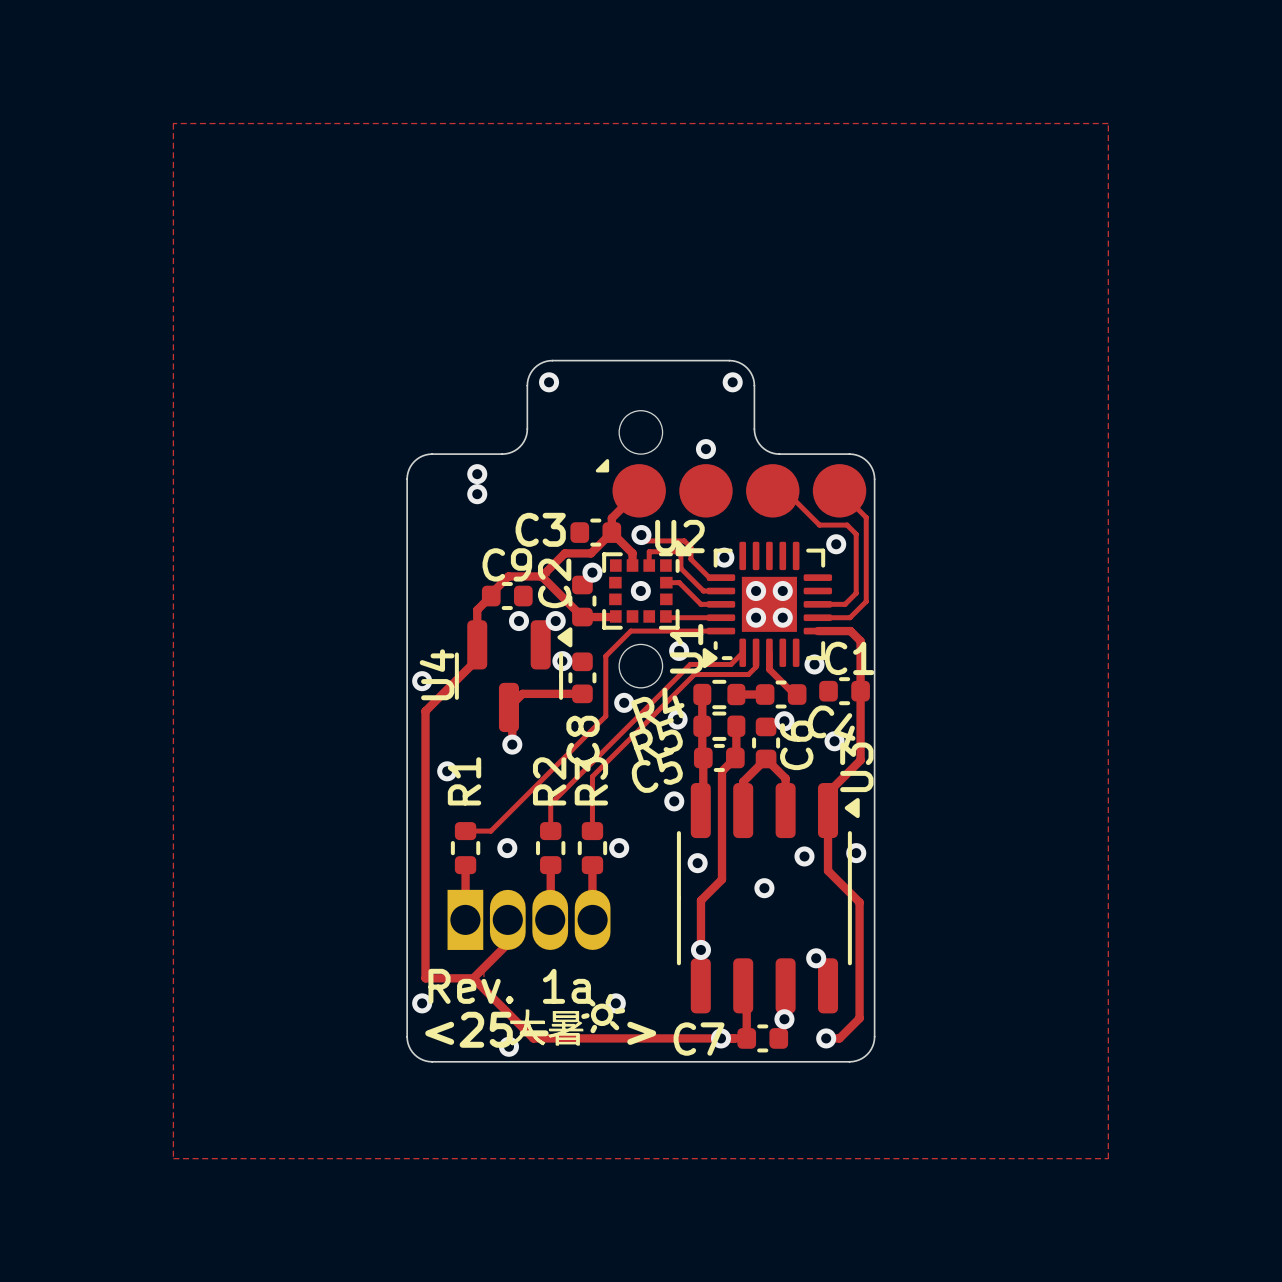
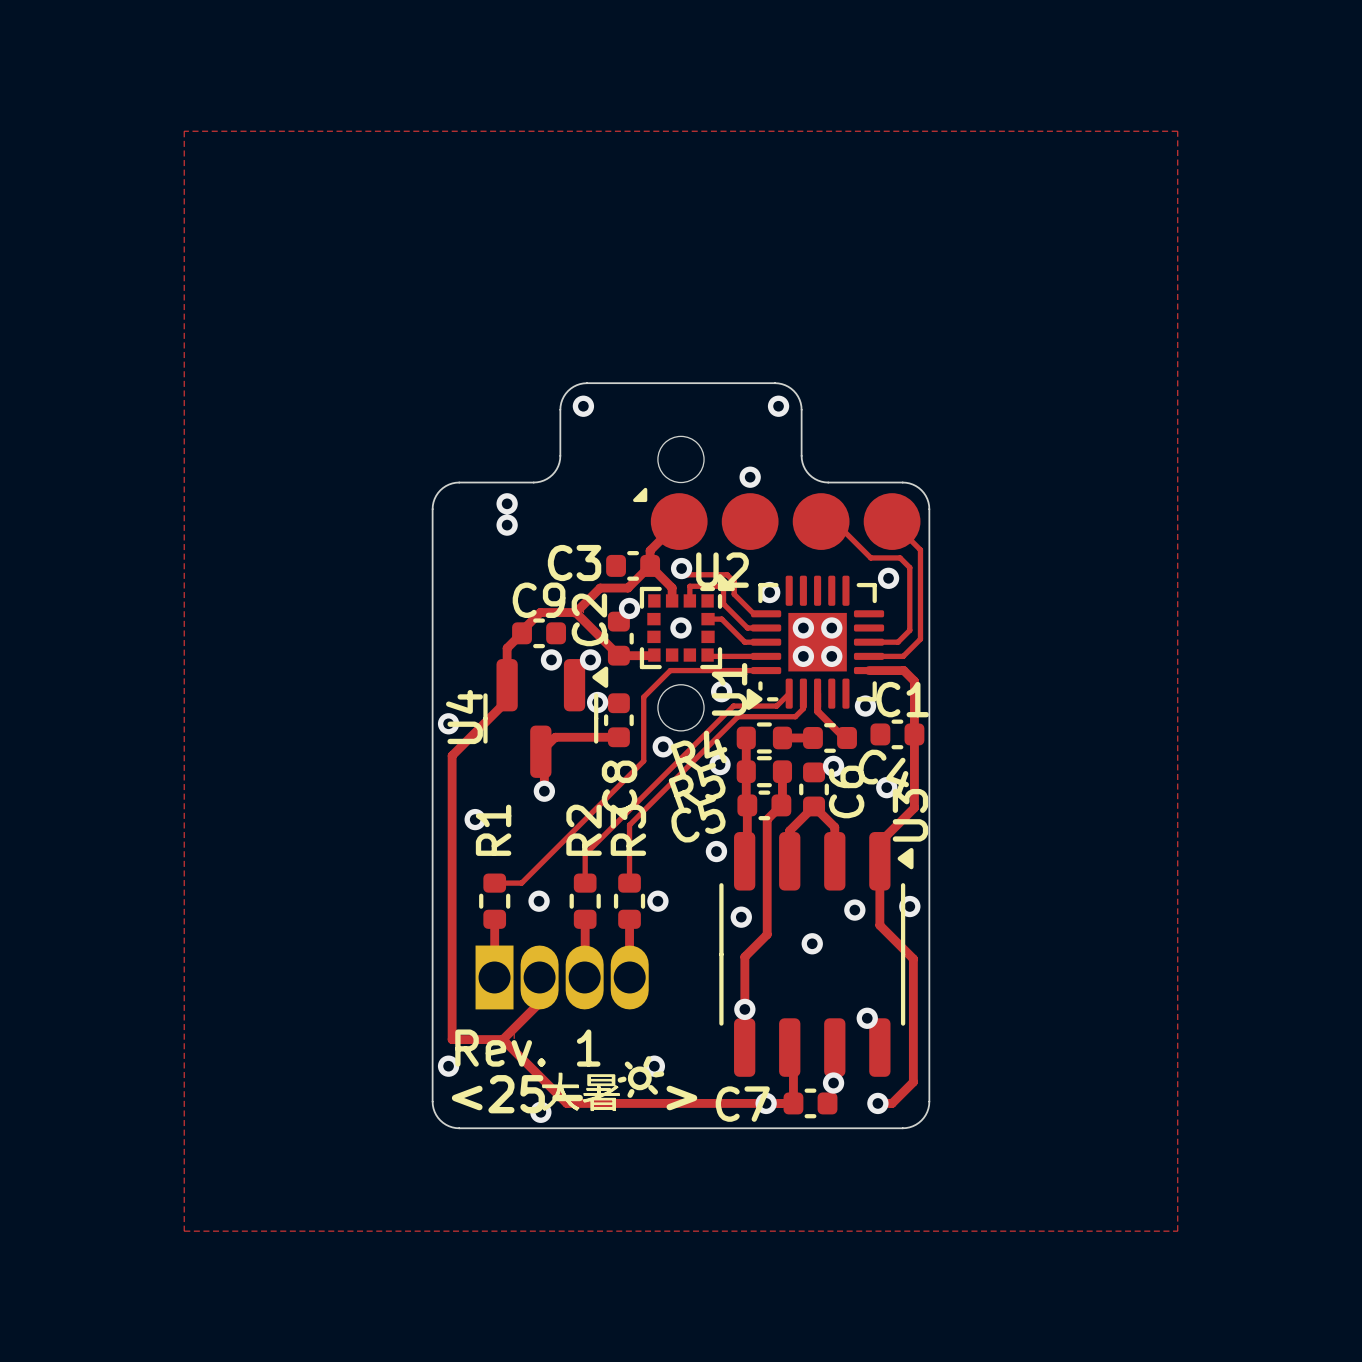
text: Rev. 1a (509, 986) -> Rev. 1 (527, 1048)

